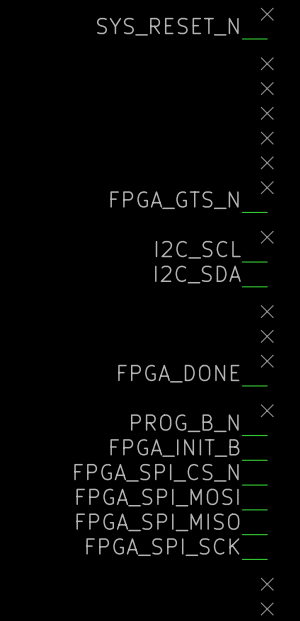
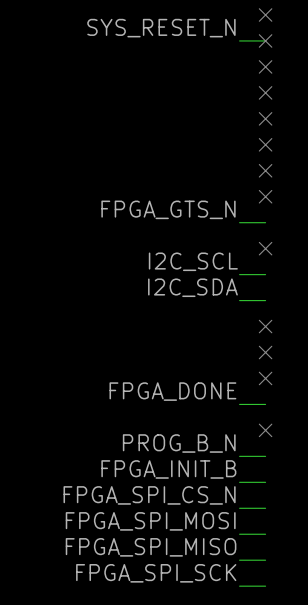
no-connect mark: none -> (265, 40)

